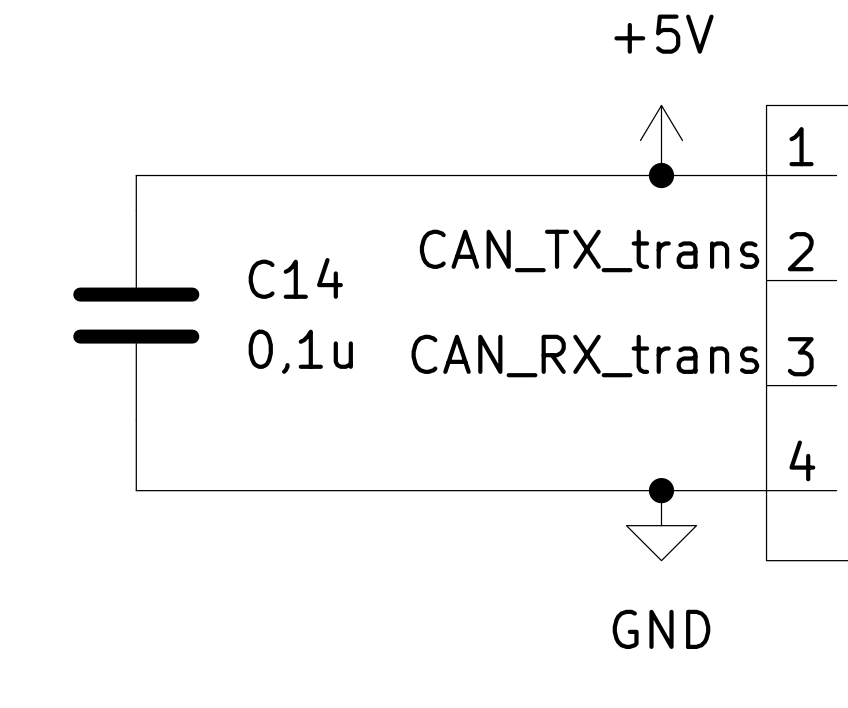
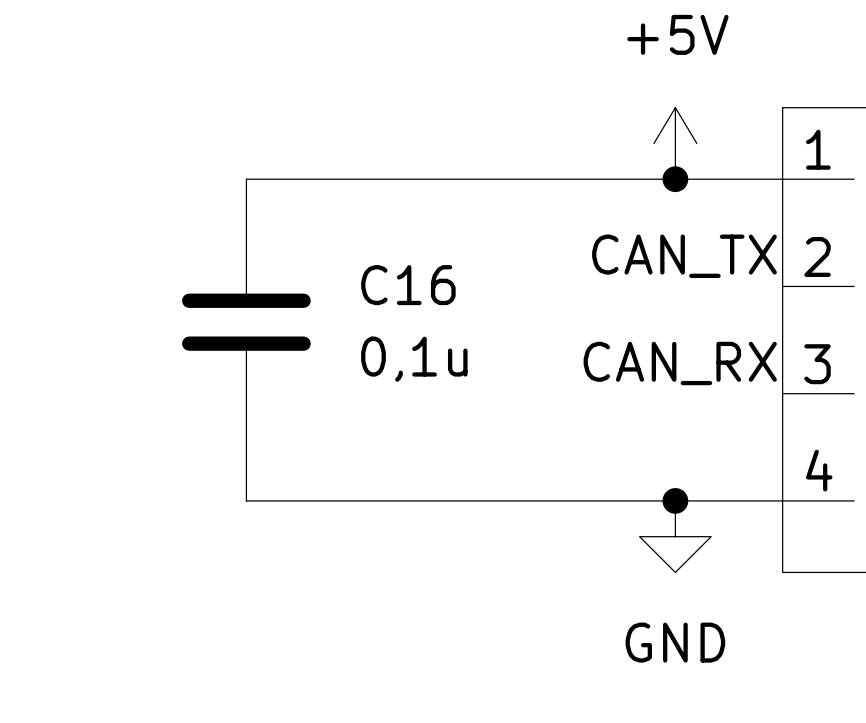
wire: (241, 175) (136, 175) (136, 210) -> (246, 179) (246, 214)
label: CAN_TX_trans (589, 250) -> CAN_TX (684, 256)
C14: 0,1u (136, 315) -> none
C16: none -> 0,1u (246, 322)
label: CAN_RX_trans (585, 356) -> CAN_RX (680, 363)
wire: (136, 420) (136, 490) (241, 490) -> (246, 429) (246, 500)

